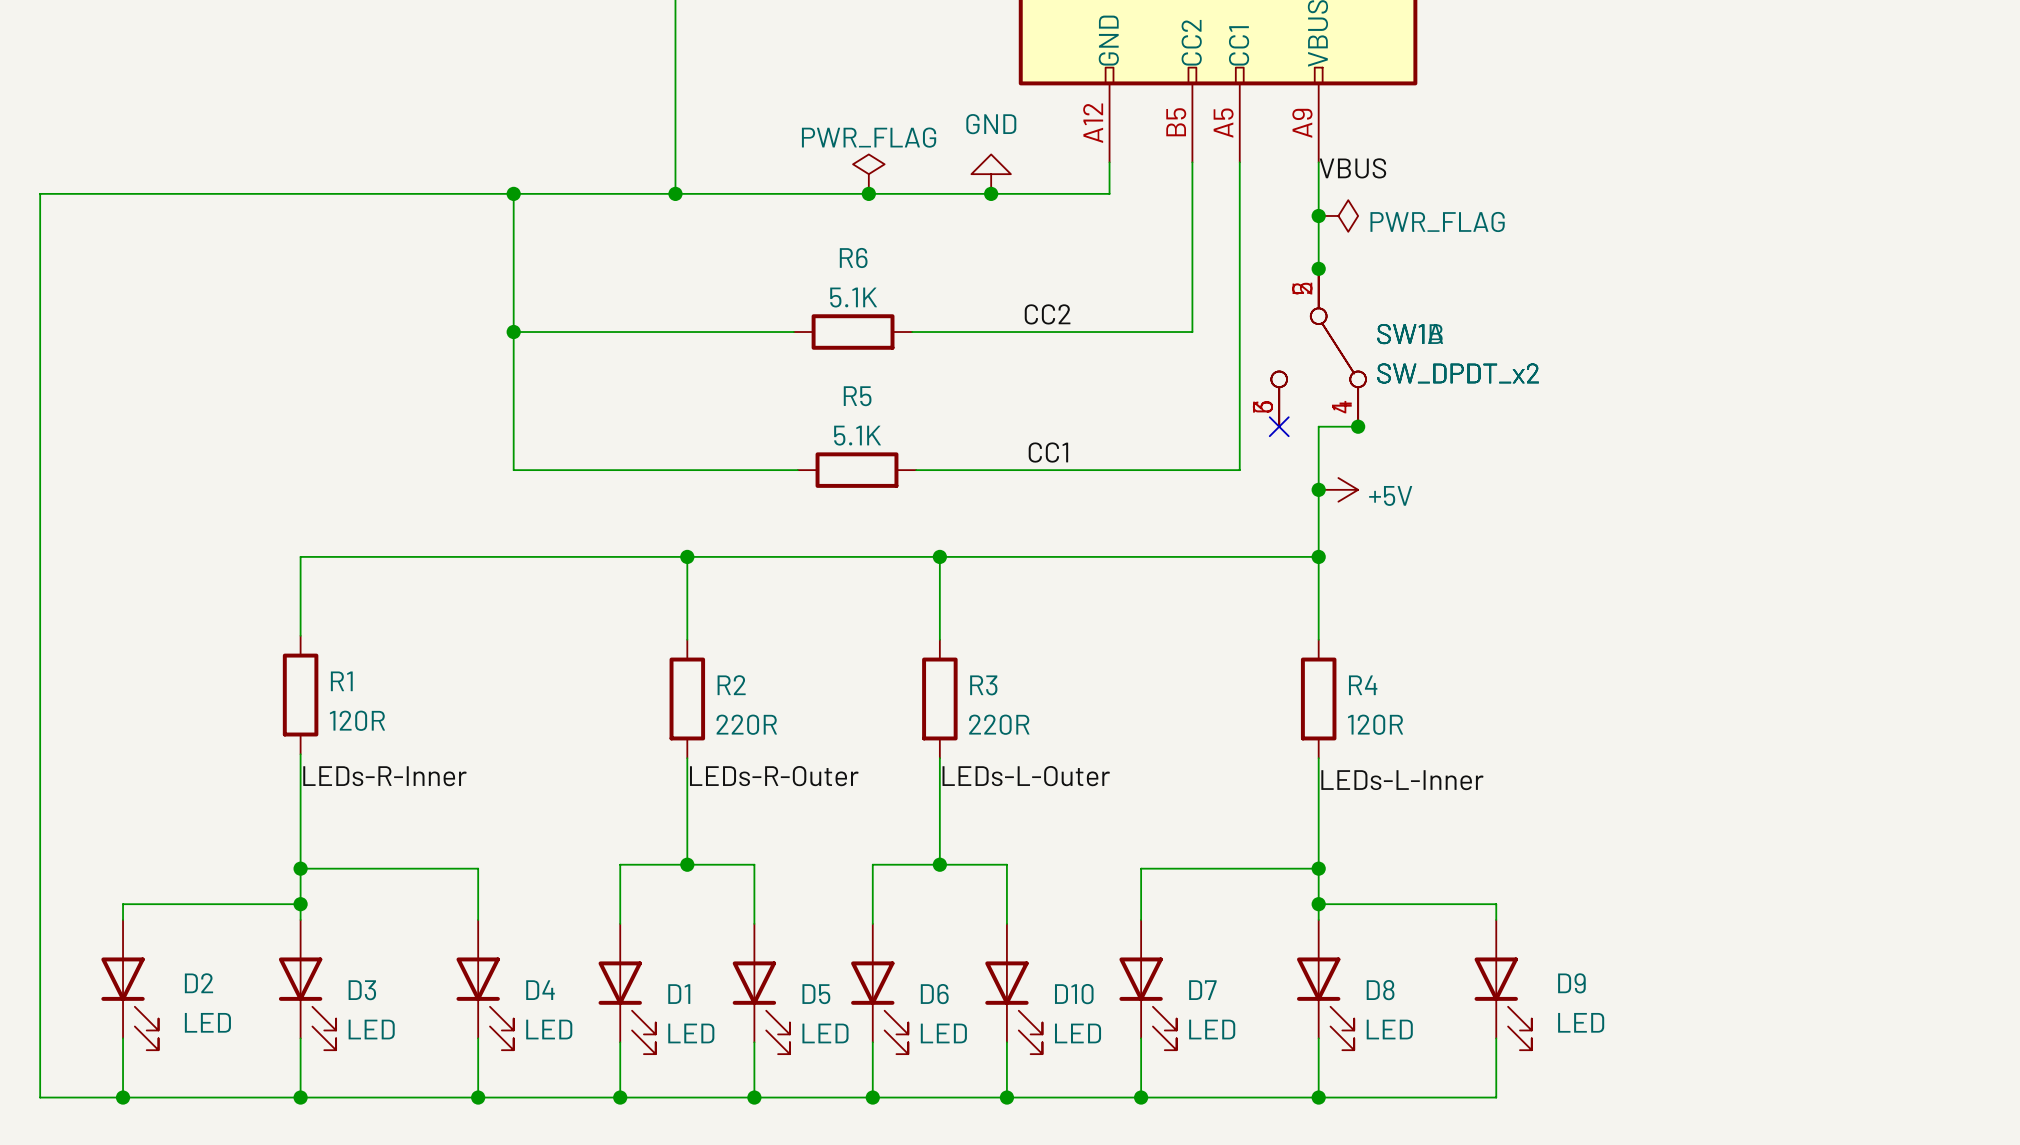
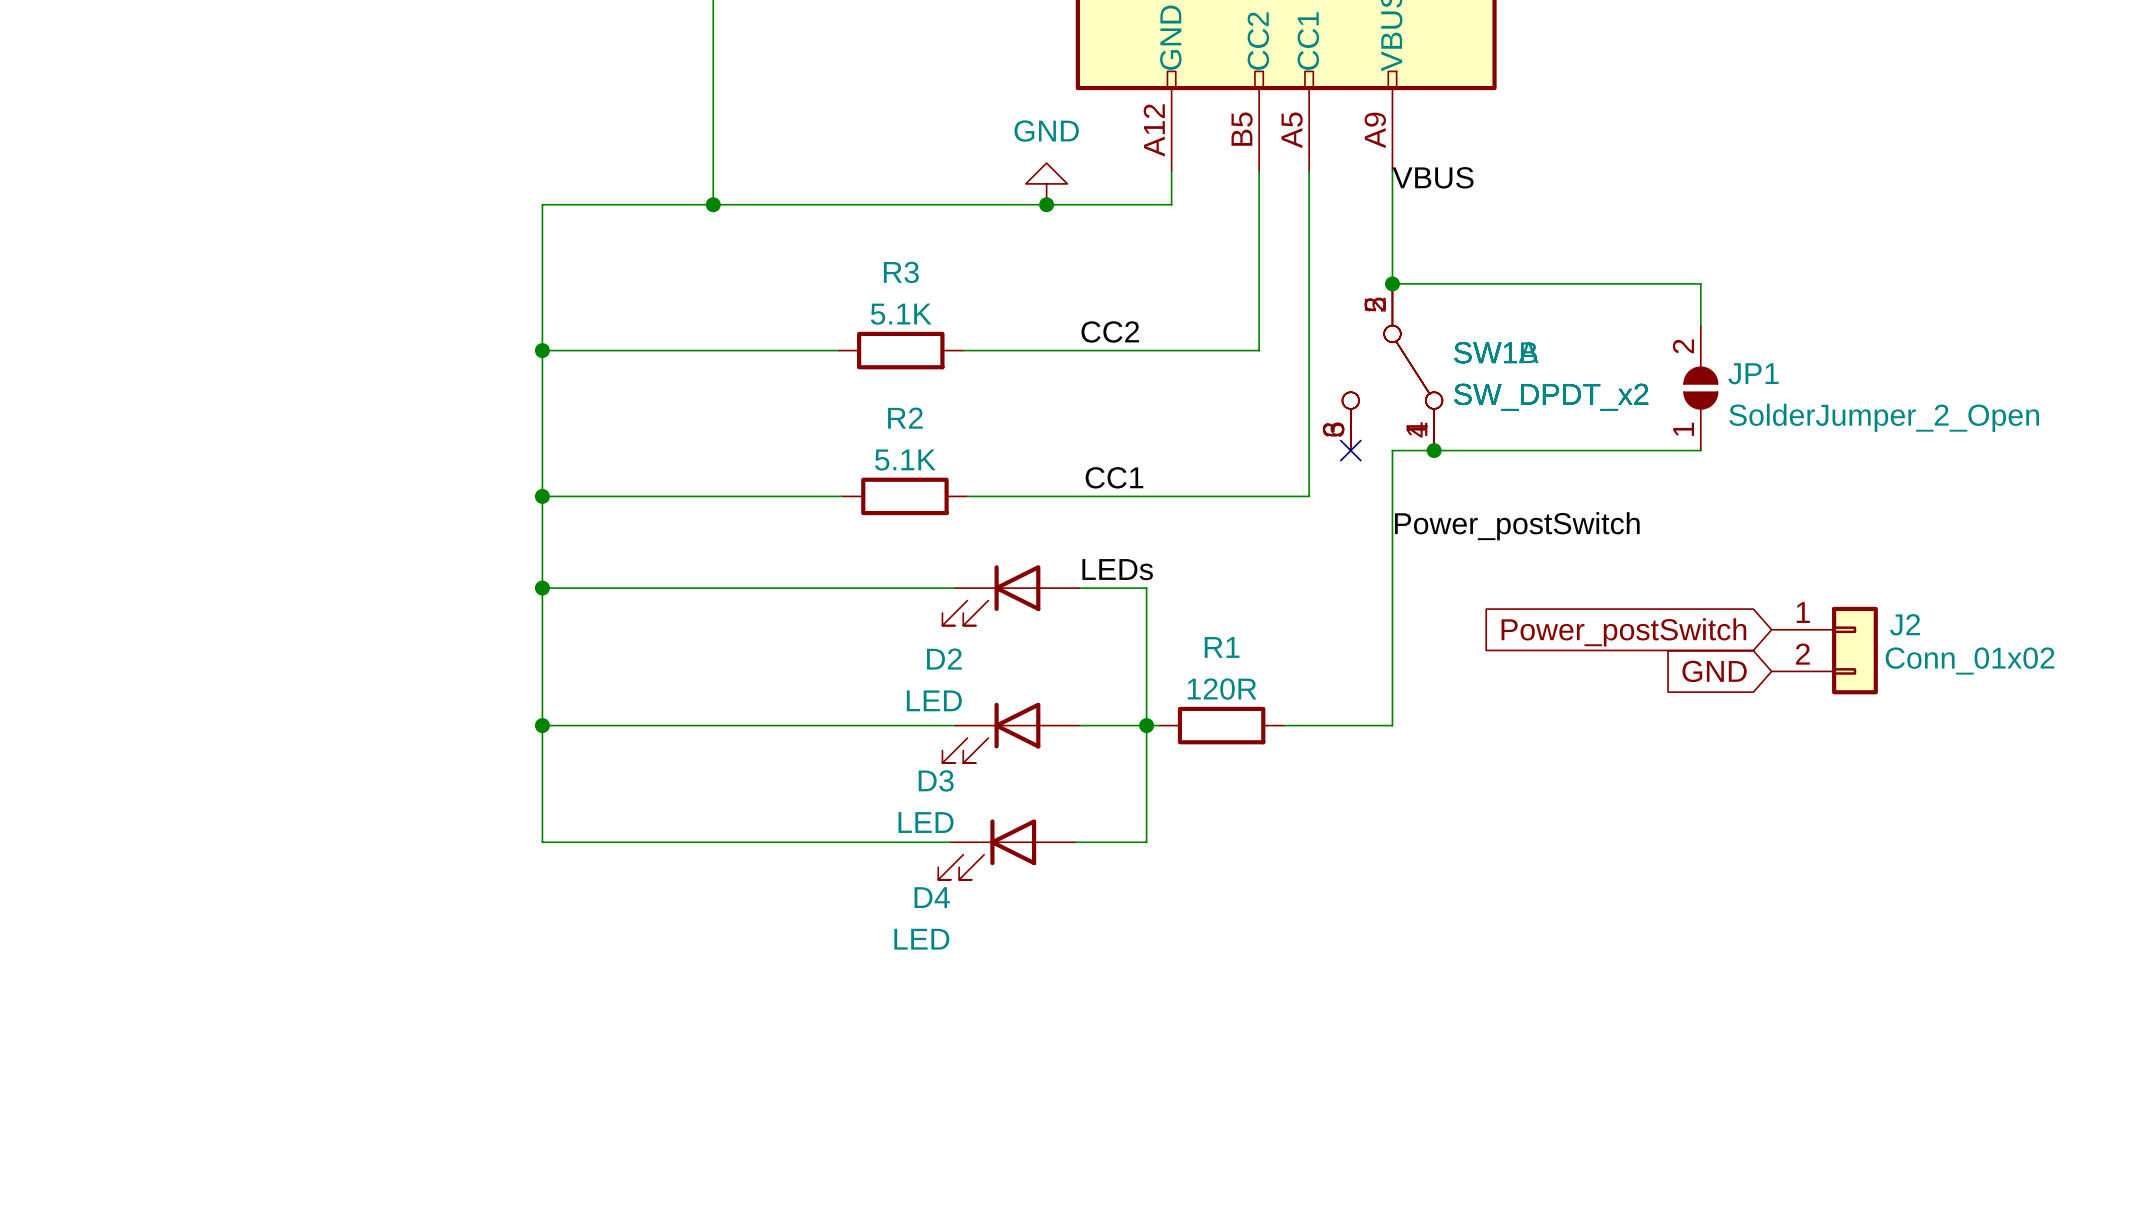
power symbol: PWR_FLAG (868, 174) -> none
wire: (513, 193) (40, 193) (40, 1097) (1496, 1097) (1496, 1038) -> none
junction: (513, 193) -> none
junction: (868, 193) -> none
junction: (1318, 215) -> none
power symbol: PWR_FLAG (1338, 215) -> none
R6 name: R6 (853, 257) -> R3 (901, 272)
wire: none -> (1392, 283) (1700, 283) (1700, 325)
JP1: none -> SolderJumper_2_Open (1700, 388)
R5 name: R5 (857, 396) -> R2 (905, 418)
wire: none -> (1434, 450) (1700, 450)
wire: none -> (542, 496) (542, 842) (950, 842)
junction: none -> (542, 496)
junction: (1318, 489) -> none
power symbol: +5V (1338, 489) -> none
label: none -> Power_postSwitch (1517, 526)
label: none -> LEDs (1117, 569)
wire: (513, 556) (300, 556) (300, 635) -> none
junction: none -> (542, 588)
wire: (687, 556) (687, 639) -> none
junction: (687, 556) -> none
wire: (939, 556) (939, 639) -> none
junction: (939, 556) -> none
wire: (1085, 556) (1318, 556) -> (1146, 588) (1146, 842) (1075, 842)
junction: (1318, 556) -> none
global label: none -> Power_postSwitch (1623, 632)
J2: none -> Conn_01x02 (1824, 650)
global label: none -> GND (1714, 671)
wire: none -> (1392, 675) (1392, 725) (1284, 725)
R1 name position: R1 (341, 681) -> R1 (1222, 647)
wire: none -> (542, 725) (954, 725)
junction: none -> (542, 725)
wire: none -> (1079, 725) (1159, 725)
junction: none -> (1146, 725)
R1 rotation: 0° (300, 695) -> 90° clockwise (1221, 725)
R1 position: (300, 695) -> (1221, 725)
R2: 220R (687, 698) -> none
R3: 220R (939, 698) -> none
R4: 120R (1318, 698) -> none
R1 value position: 120R (357, 720) -> 120R (1222, 689)
wire: (300, 754) (300, 919) -> none
wire: (687, 758) (687, 864) -> none
wire: (939, 758) (939, 864) -> none
wire: (1318, 758) (1318, 919) -> none
label: LEDs-R-Inner (384, 776) -> none
label: LEDs-R-Outer (774, 776) -> none
label: LEDs-L-Outer (1026, 776) -> none
label: LEDs-L-Inner (1402, 780) -> none
junction: (687, 864) -> none
junction: (939, 864) -> none
wire: (300, 868) (478, 868) (478, 919) -> none
junction: (300, 868) -> none
wire: (1318, 868) (1141, 868) (1141, 919) -> none
junction: (1318, 868) -> none
wire: (300, 904) (123, 904) (123, 919) -> none
junction: (300, 904) -> none
wire: (1318, 904) (1496, 904) (1496, 919) -> none
junction: (1318, 904) -> none
wire: (620, 923) (620, 864) (754, 864) (754, 923) -> none
wire: (872, 923) (872, 864) (1006, 864) (1006, 923) -> none
D2 name position: D2 (198, 983) -> D2 (944, 659)
D2 position: (129, 985) -> (1011, 595)
D3 position: (307, 985) -> (1011, 732)
D4 position: (485, 985) -> (1007, 849)
D7: LED (1148, 985) -> none
D8: LED (1325, 985) -> none
D9: LED (1503, 985) -> none
D1: LED (627, 989) -> none
D5: LED (761, 989) -> none
D6: LED (879, 989) -> none
D10: LED (1013, 989) -> none
D3 name position: D3 (362, 990) -> D3 (936, 780)
D4 name position: D4 (540, 990) -> D4 (932, 897)
D2 rotation: 0° (129, 1003) -> 90° clockwise (991, 595)
D3 rotation: 0° (307, 1003) -> 90° clockwise (991, 732)
D4 rotation: 0° (485, 1003) -> 90° clockwise (987, 849)
D2 value position: LED (207, 1022) -> LED (934, 700)
D3 value position: LED (371, 1029) -> LED (926, 822)
D4 value position: LED (549, 1029) -> LED (921, 939)
wire: (123, 1038) (123, 1097) -> none
wire: (300, 1038) (300, 1097) -> none
wire: (478, 1038) (478, 1097) -> none
wire: (1141, 1038) (1141, 1097) -> none
wire: (1318, 1038) (1318, 1097) -> none
wire: (620, 1042) (620, 1097) -> none
wire: (754, 1042) (754, 1097) -> none
wire: (872, 1042) (872, 1097) -> none
wire: (1006, 1042) (1006, 1097) -> none
junction: (123, 1097) -> none
junction: (300, 1097) -> none
junction: (478, 1097) -> none
junction: (620, 1097) -> none
junction: (754, 1097) -> none
junction: (872, 1097) -> none
junction: (1006, 1097) -> none
junction: (1141, 1097) -> none
junction: (1318, 1097) -> none

